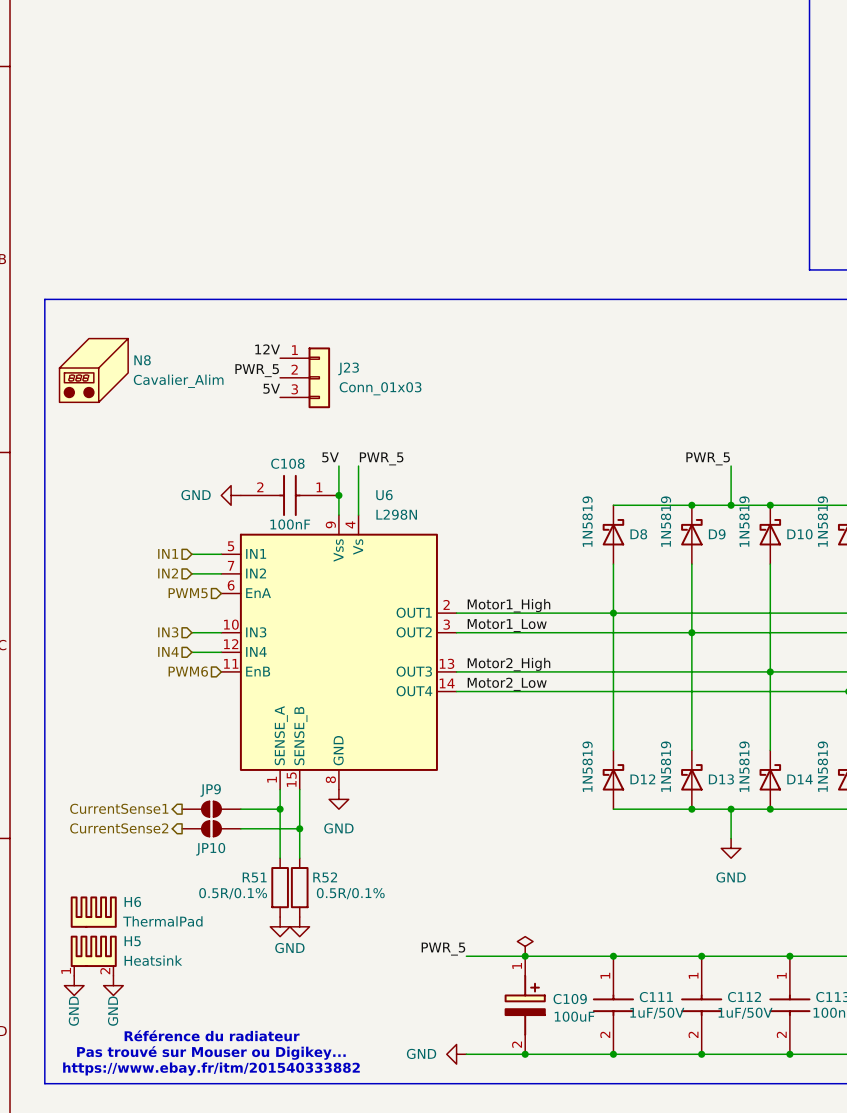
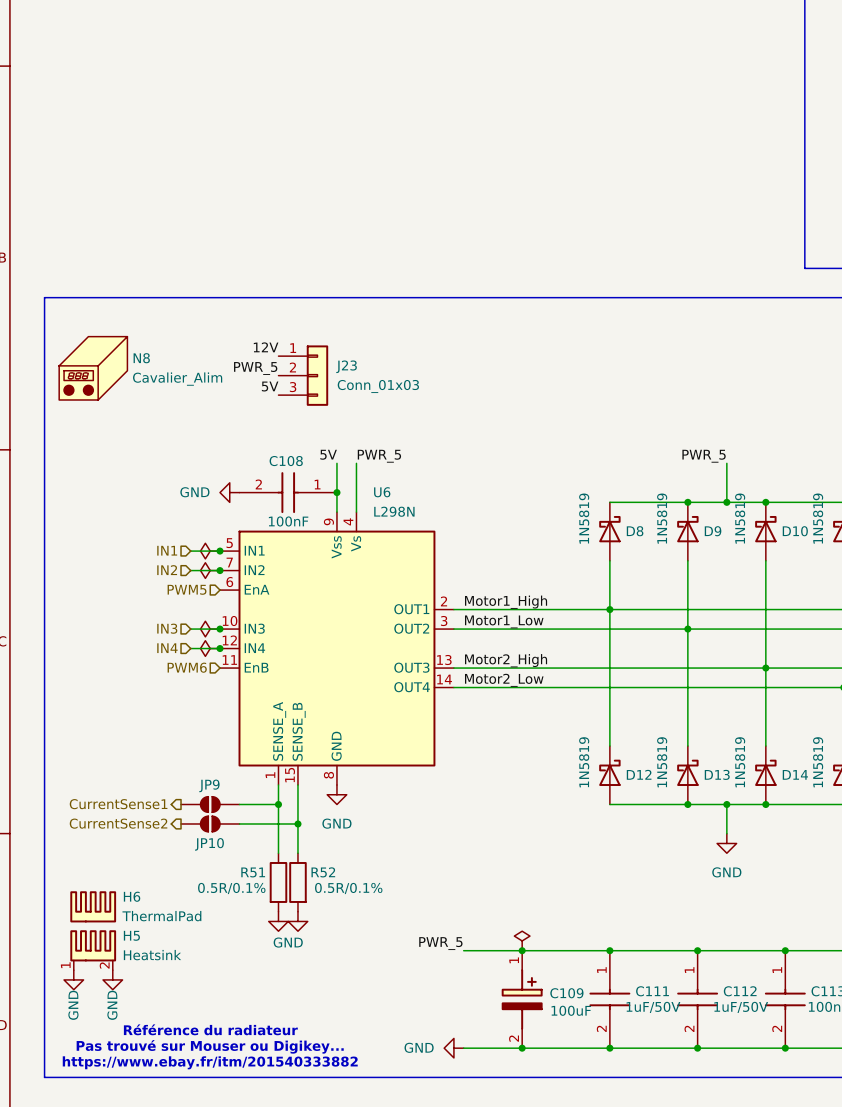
power symbol: none -> (210, 551)
junction: none -> (220, 551)
power symbol: none -> (210, 570)
junction: none -> (220, 570)
power symbol: none -> (210, 629)
junction: none -> (220, 629)
power symbol: none -> (210, 648)
junction: none -> (220, 648)

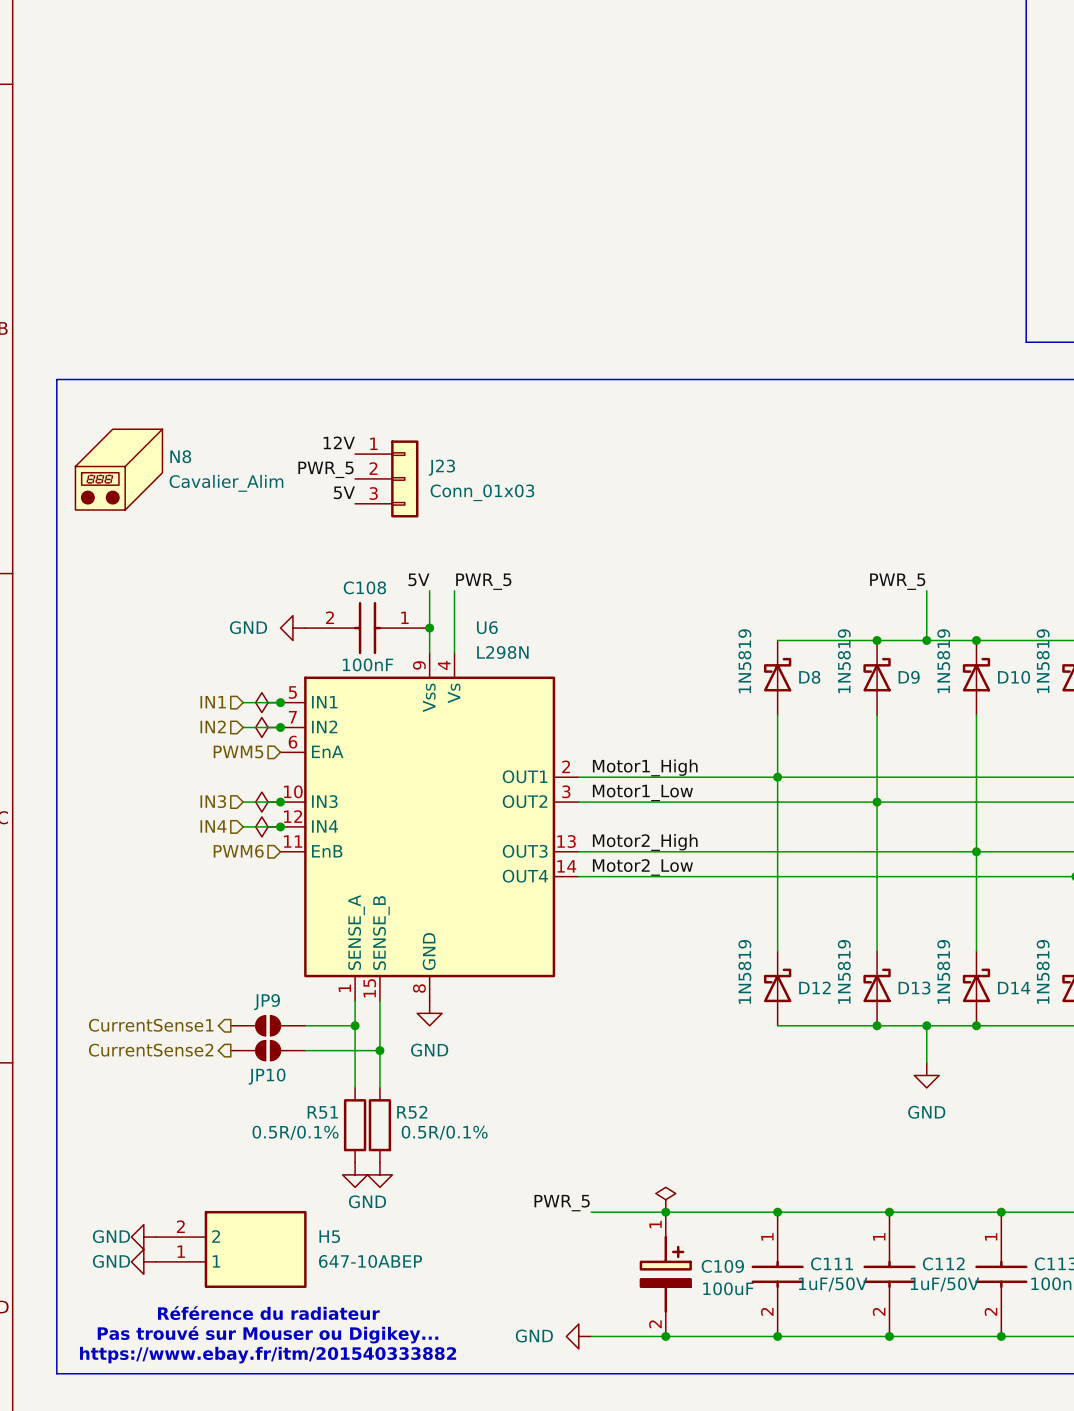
H6: ThermalPad (93, 906) -> none
H5 symbol: [70, 930, 117, 971] -> [156, 1210, 307, 1289]
H5 name position: H5 (131, 935) -> H5 (329, 1236)
H5 value: Heatsink (152, 955) -> 647-10ABEP (370, 1261)
power symbol: none -> GND (143, 1237)
power symbol: GND (73, 979) -> none
power symbol: GND (112, 979) -> none
power symbol: none -> GND (143, 1261)

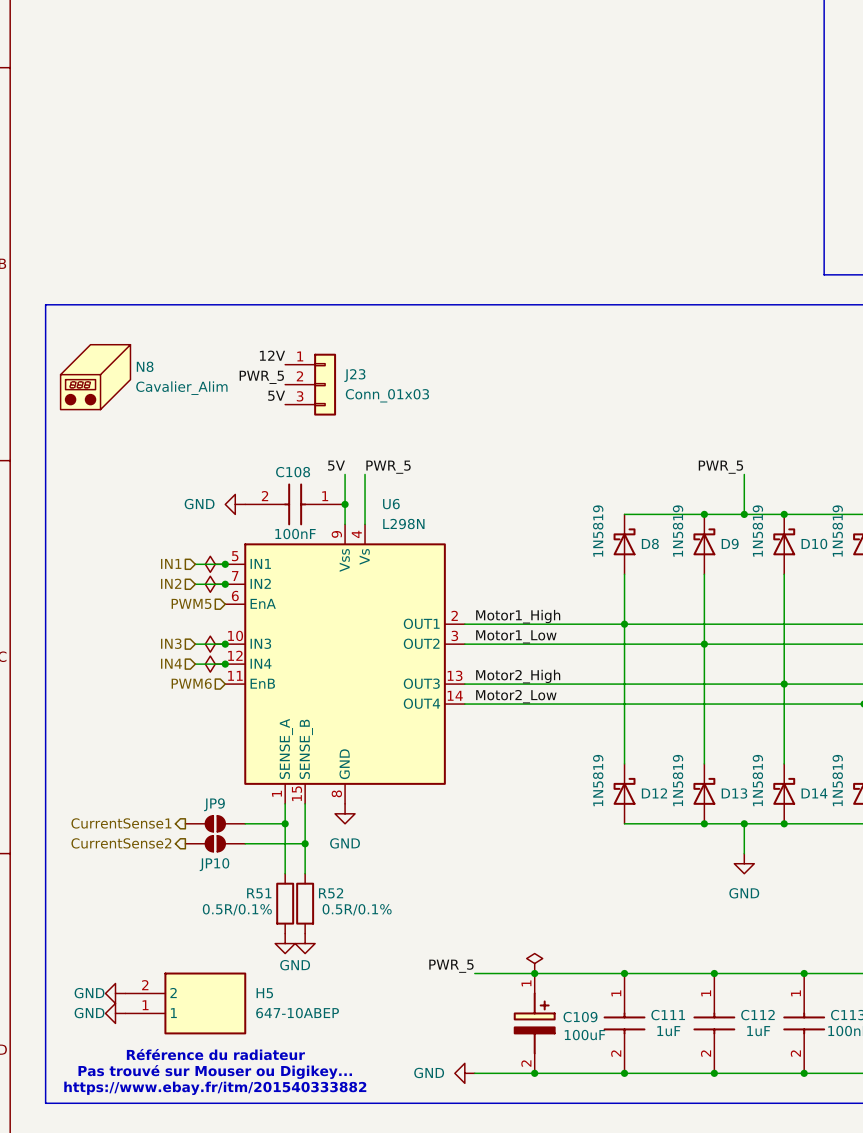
C111 value: 1uF/50V (833, 1284) -> 1uF (668, 1031)
C112 value: 1uF/50V (945, 1284) -> 1uF (758, 1031)

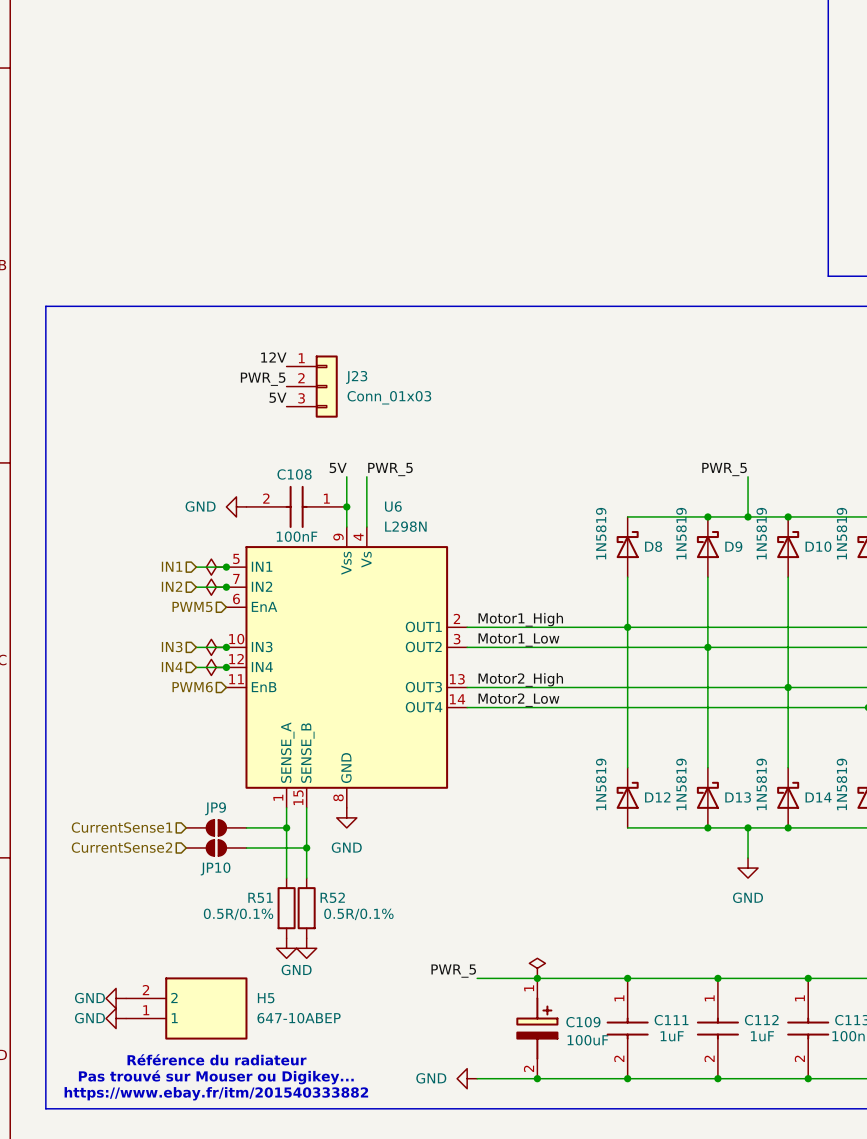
N8: Cavalier_Alim (95, 377) -> none
hierarchical label shape: output (121, 823) -> input (122, 827)
hierarchical label shape: output (121, 843) -> input (121, 847)

